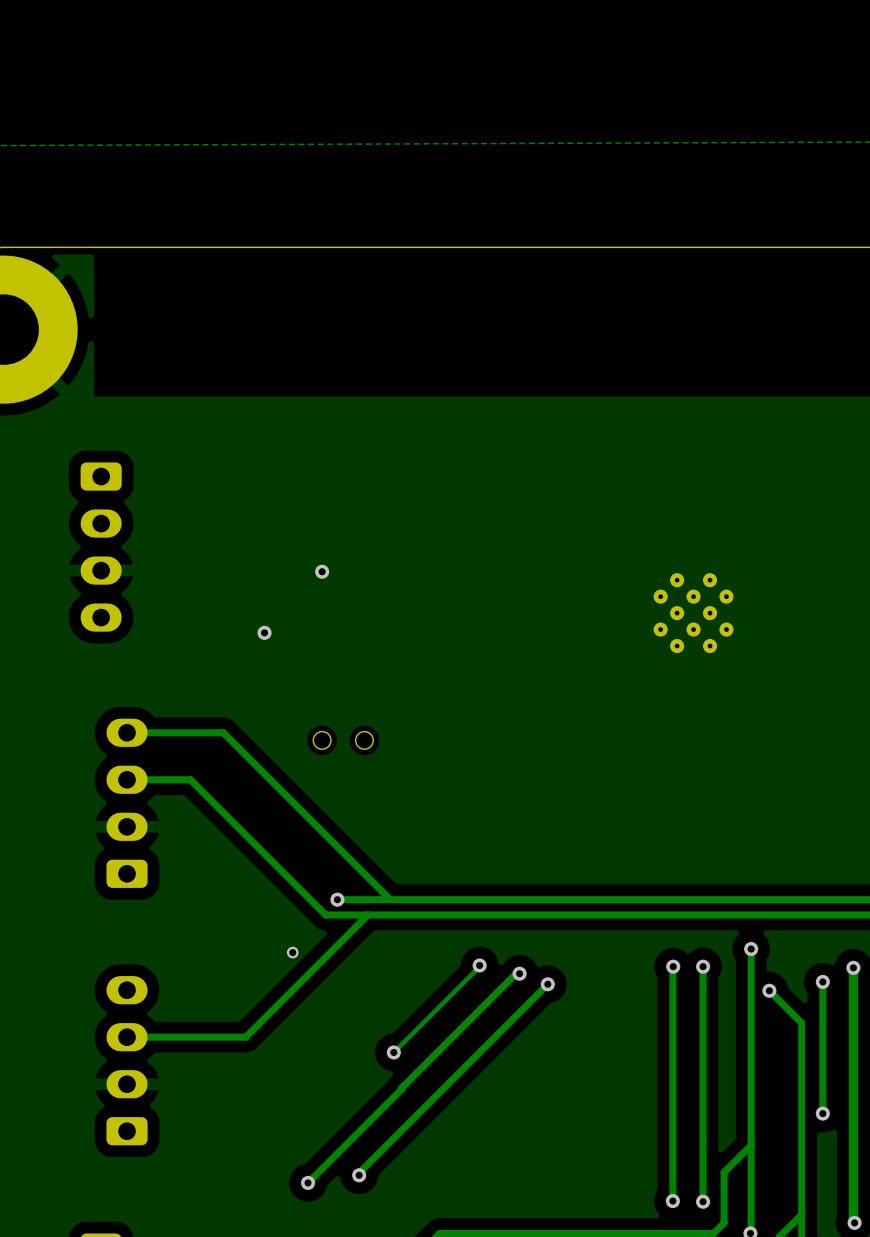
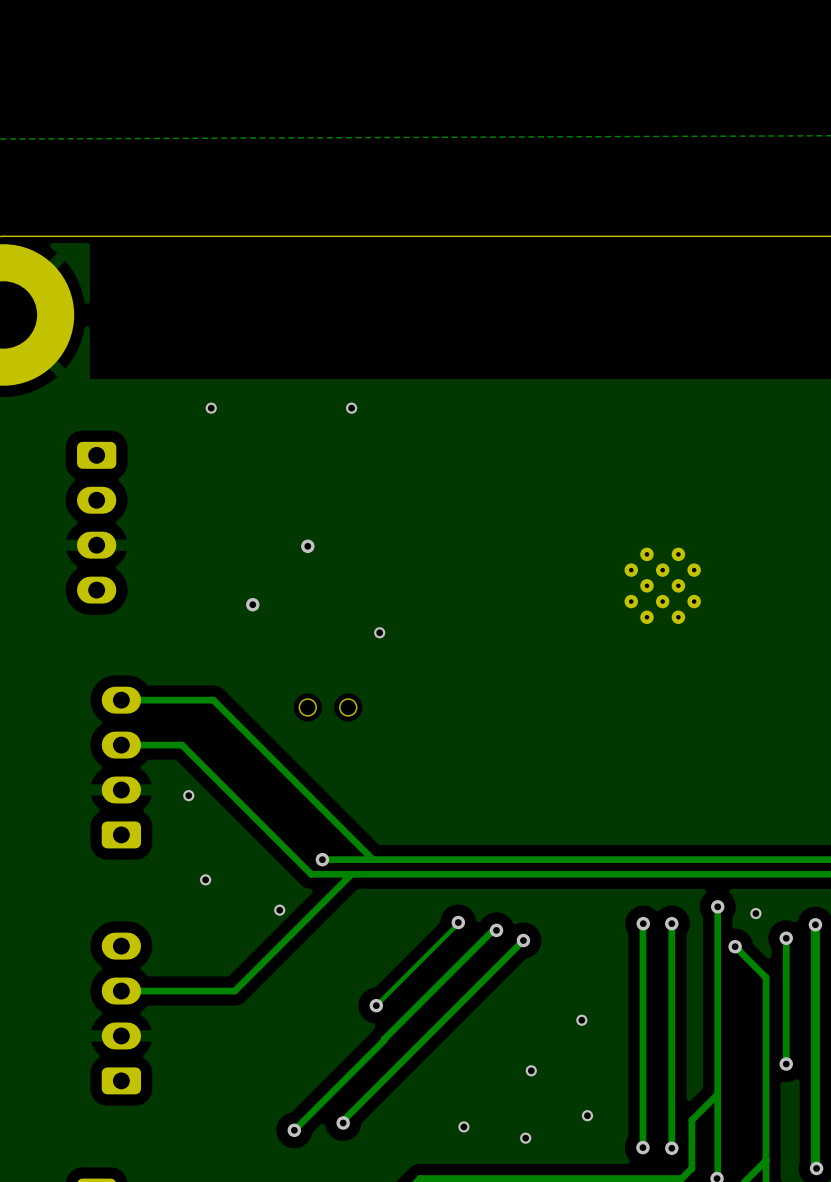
via: none -> (211, 408)
via: none -> (351, 408)
via: none -> (379, 632)
via: none -> (188, 795)
via: none -> (205, 879)
via: none -> (755, 913)
via: none -> (581, 1020)
via: none -> (531, 1070)
via: none -> (587, 1115)
via: none -> (463, 1126)
via: none -> (525, 1138)

